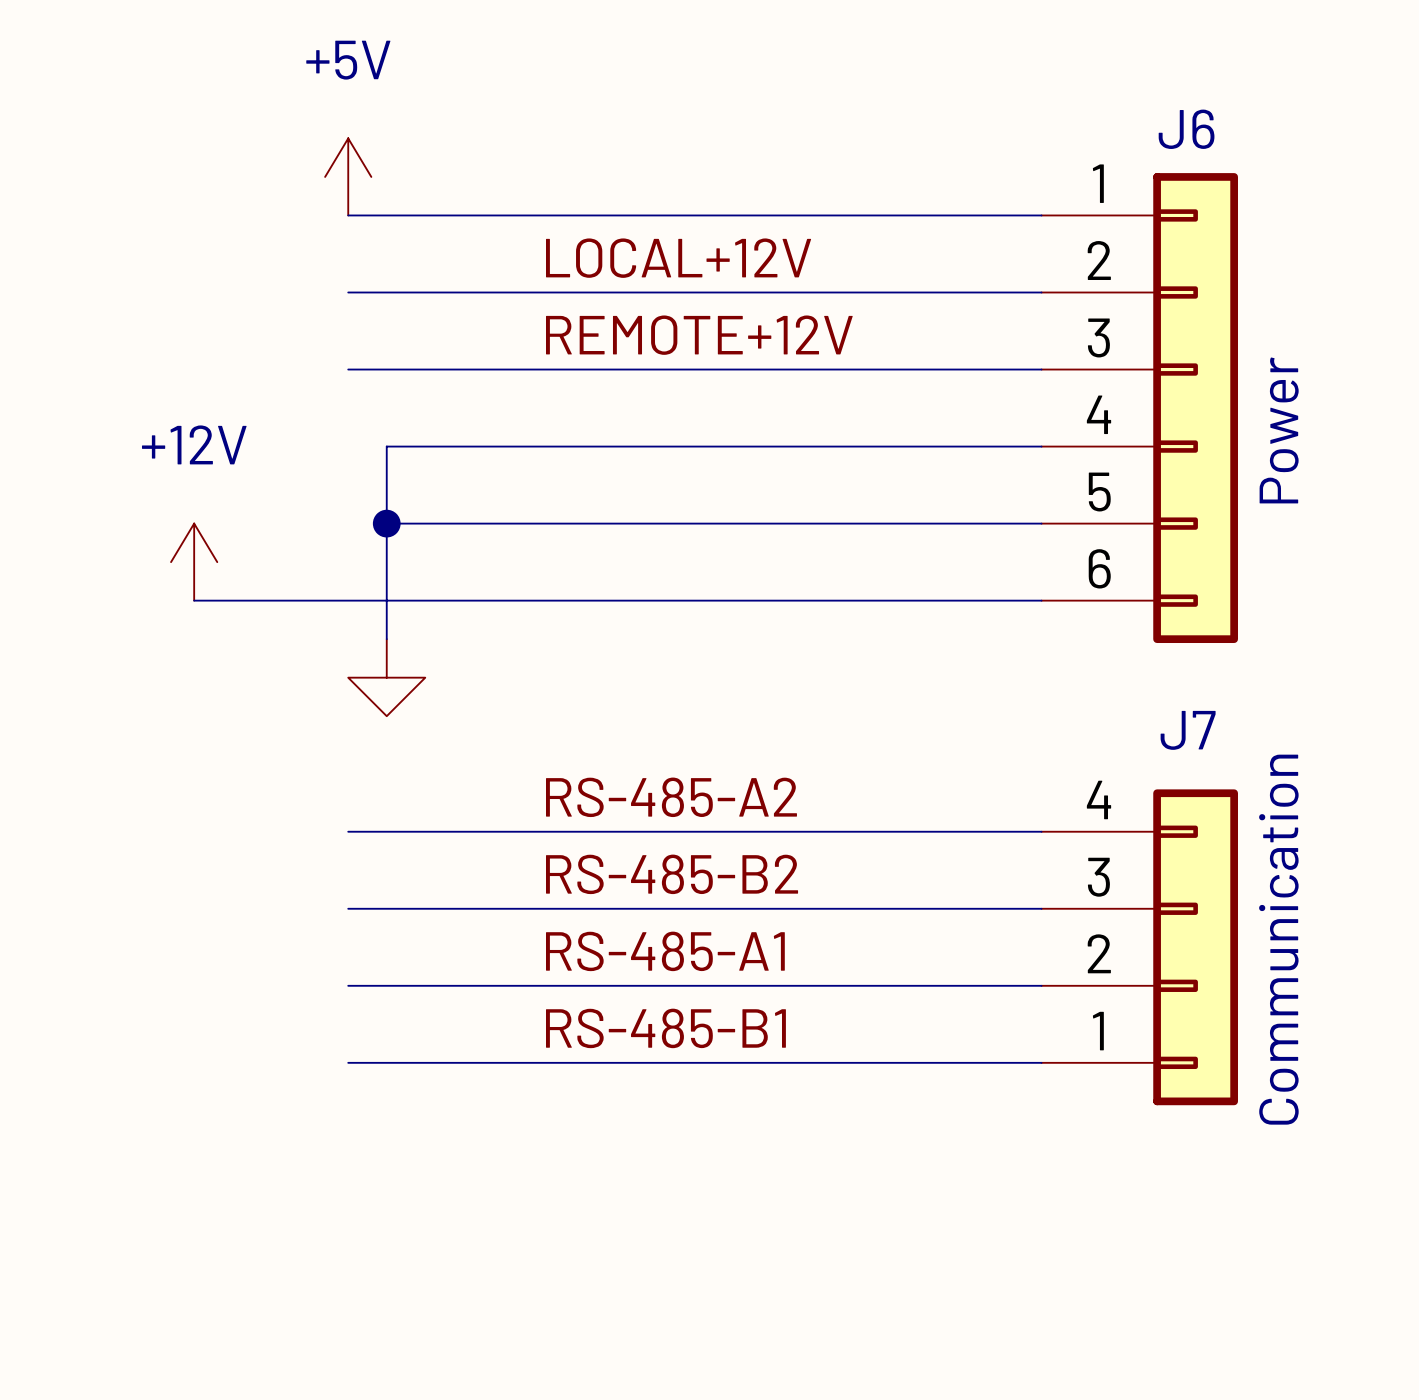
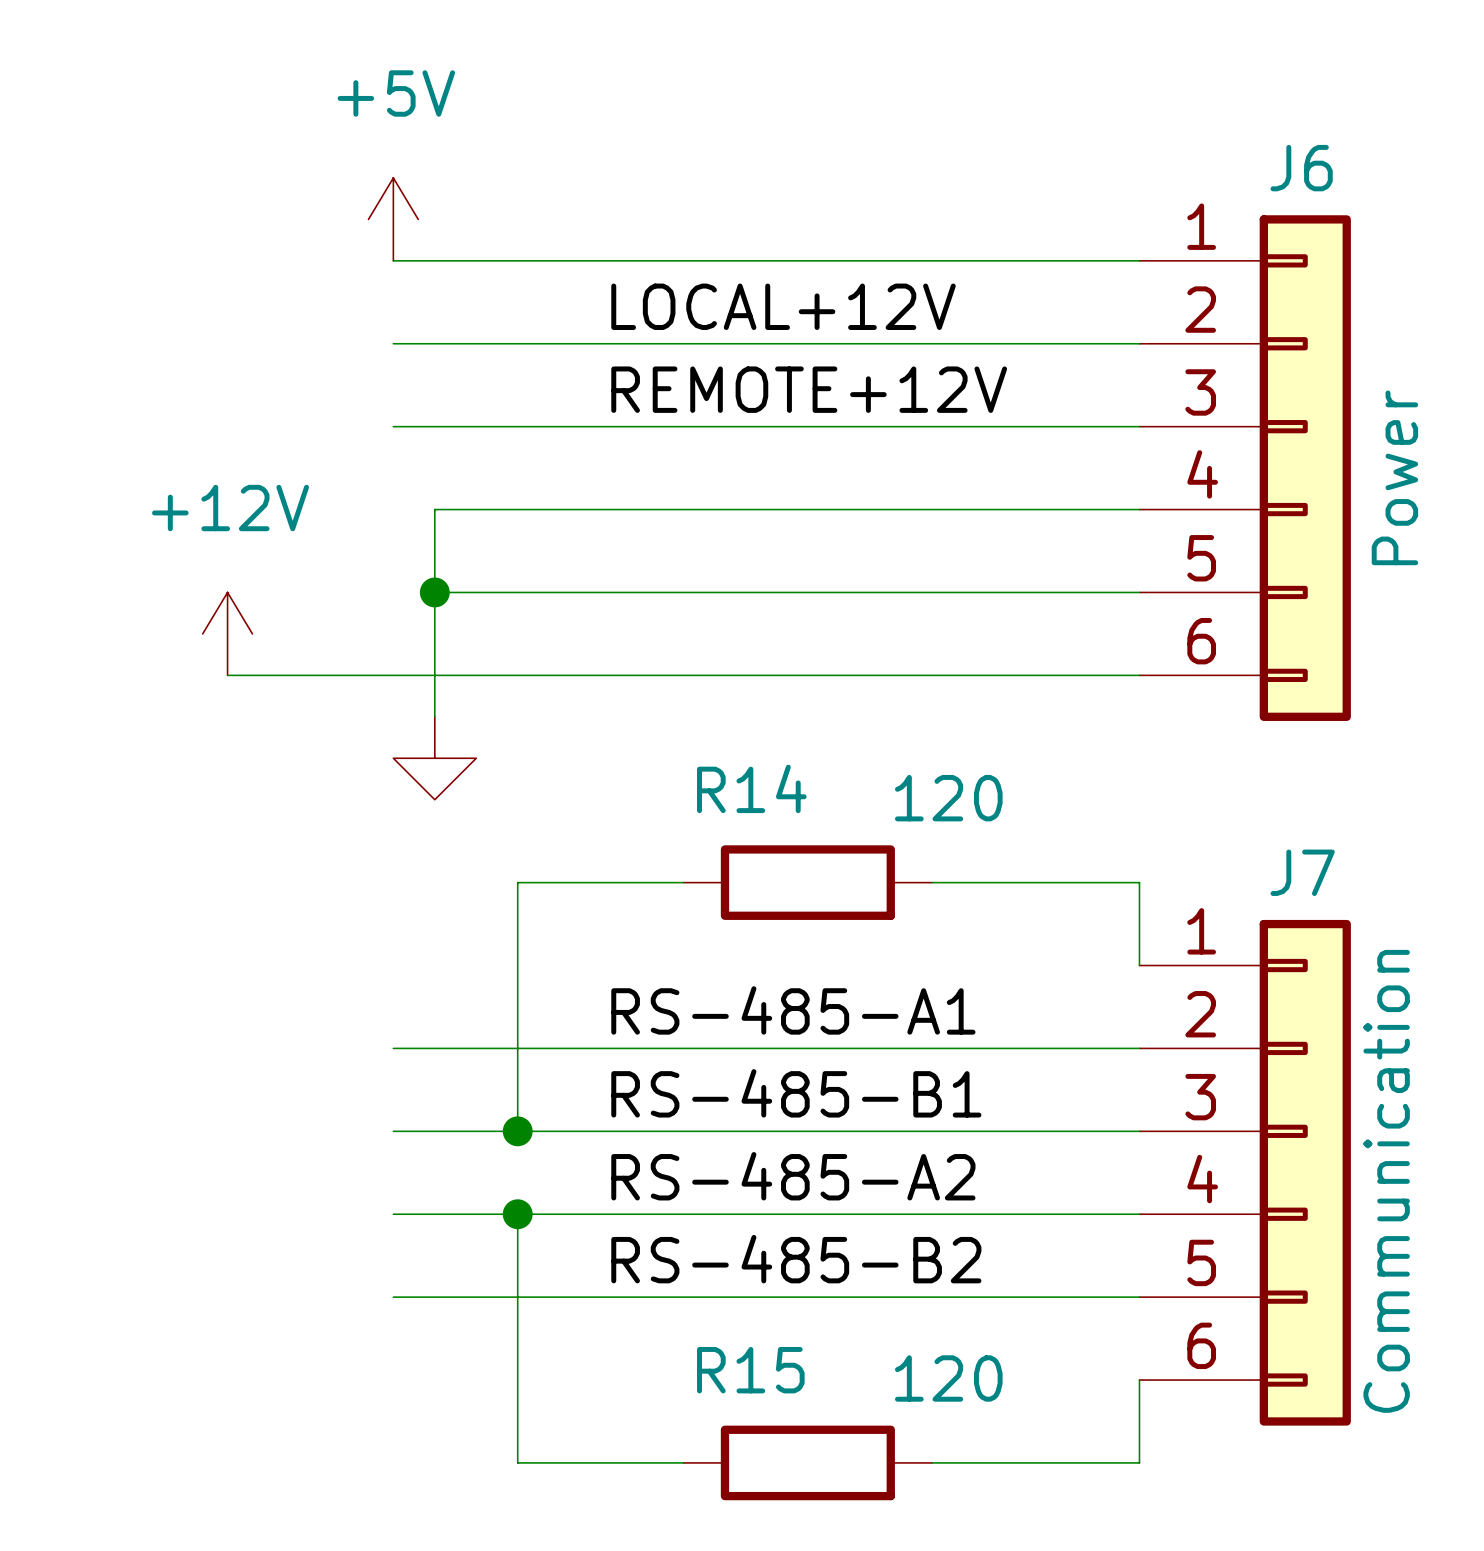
J7 name position: J7 (1188, 730) -> J7 (1302, 872)
J7 symbol: [1041, 789, 1238, 1106] -> [1139, 919, 1351, 1426]
wire: none -> (683, 882) (517, 882) (517, 1131)
R14: none -> 120 (807, 882)
wire: none -> (932, 882) (1139, 882) (1139, 965)
label position: RS-485-A2 (671, 797) -> RS-485-A2 (793, 1176)
wire: (348, 831) (1041, 831) -> (393, 1048) (1139, 1048)
label position: RS-485-B2 (672, 874) -> RS-485-B2 (796, 1259)
wire: (348, 908) (1041, 908) -> (393, 1131) (1139, 1131)
label position: RS-485-A1 (665, 951) -> RS-485-A1 (793, 1010)
wire: (348, 985) (1041, 985) -> (393, 1214) (1139, 1214)
junction: none -> (517, 1131)
label position: RS-485-B1 (665, 1028) -> RS-485-B1 (796, 1093)
wire: (348, 1062) (1041, 1062) -> (393, 1297) (1139, 1297)
wire: none -> (517, 1214) (517, 1462) (683, 1462)
junction: none -> (517, 1214)
wire: none -> (1139, 1380) (1139, 1462) (932, 1462)
R15: none -> 120 (807, 1462)

